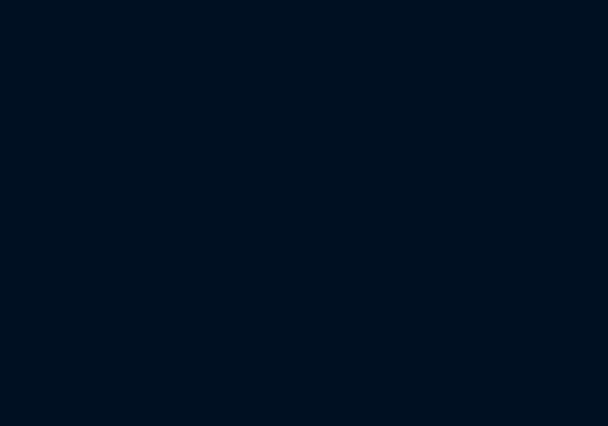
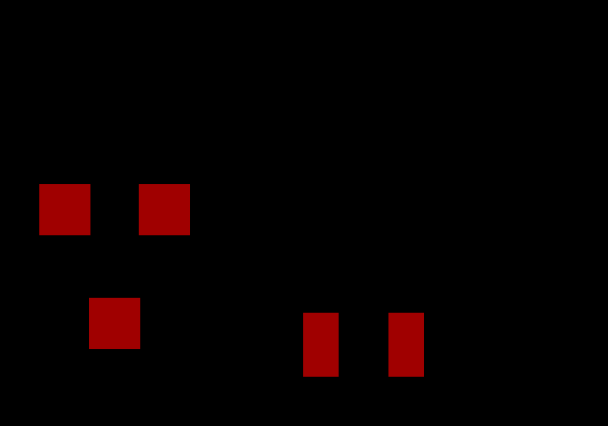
part: none -> (114, 266)
part: none -> (363, 344)

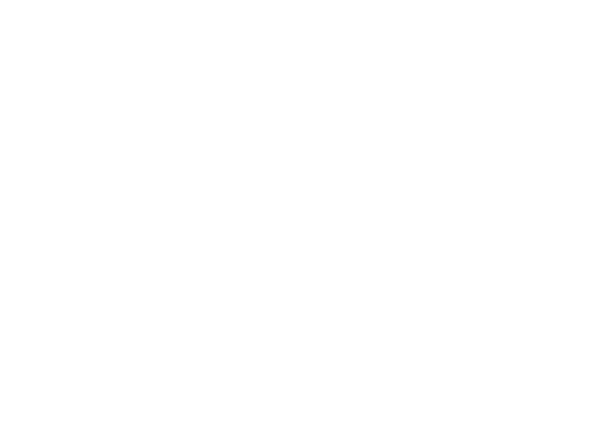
part: (114, 266) -> none
part: (363, 344) -> none

